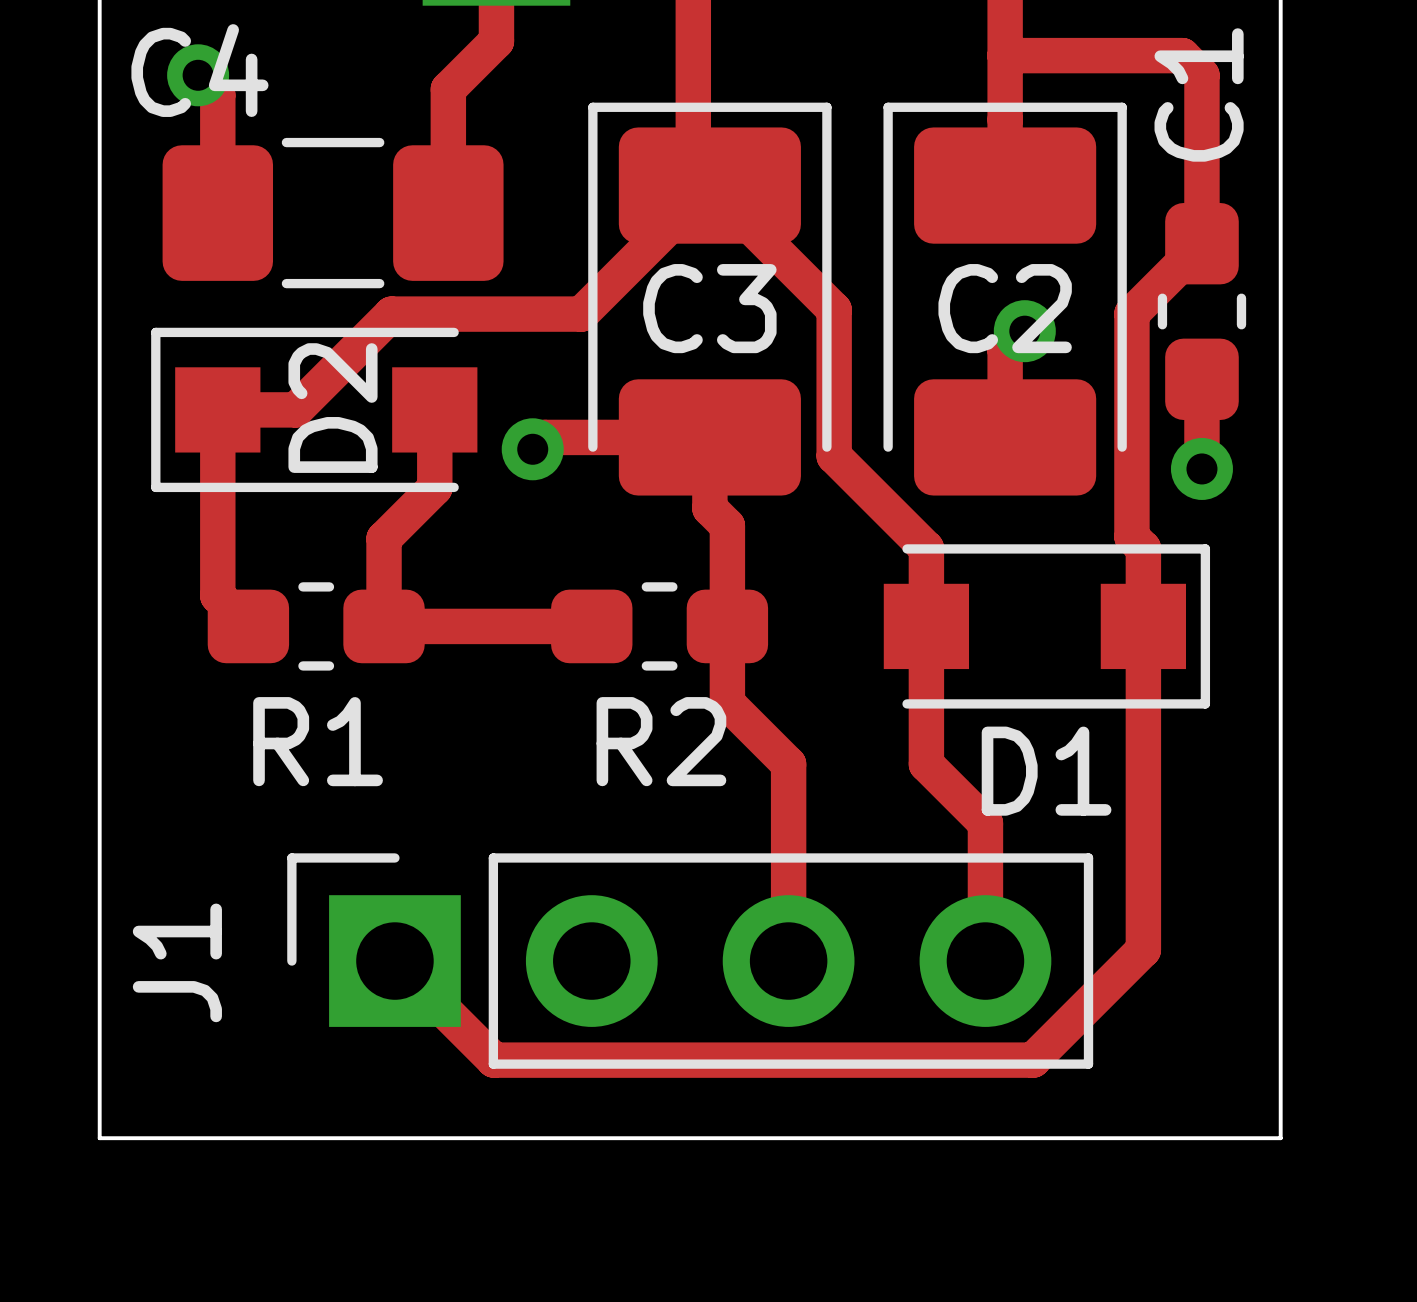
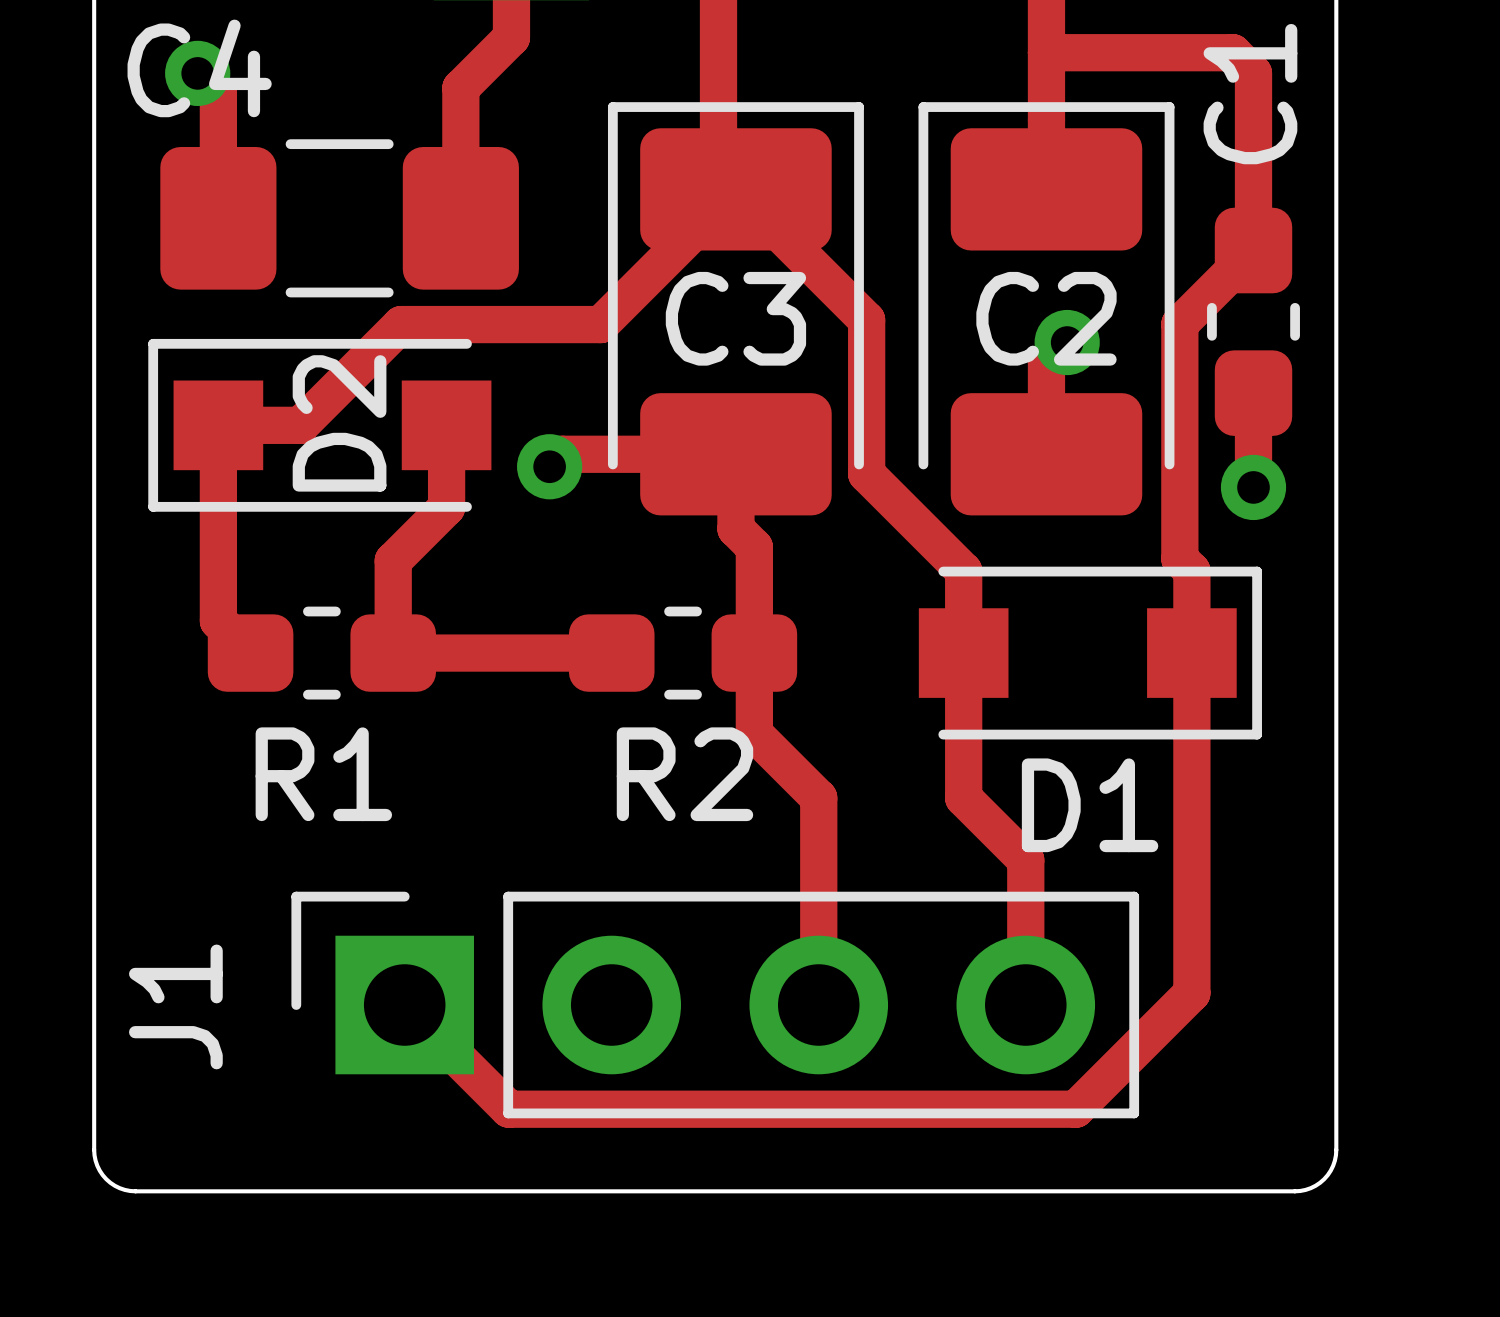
board edge: (99, 1098) (99, 1138) (139, 1138) -> (94, 1149) (97, 1165) (106, 1179) (119, 1188) (135, 1191)
board edge: (1280, 1098) (1280, 1138) (1241, 1138) -> (1336, 1149) (1333, 1165) (1324, 1179) (1310, 1188) (1294, 1191)

